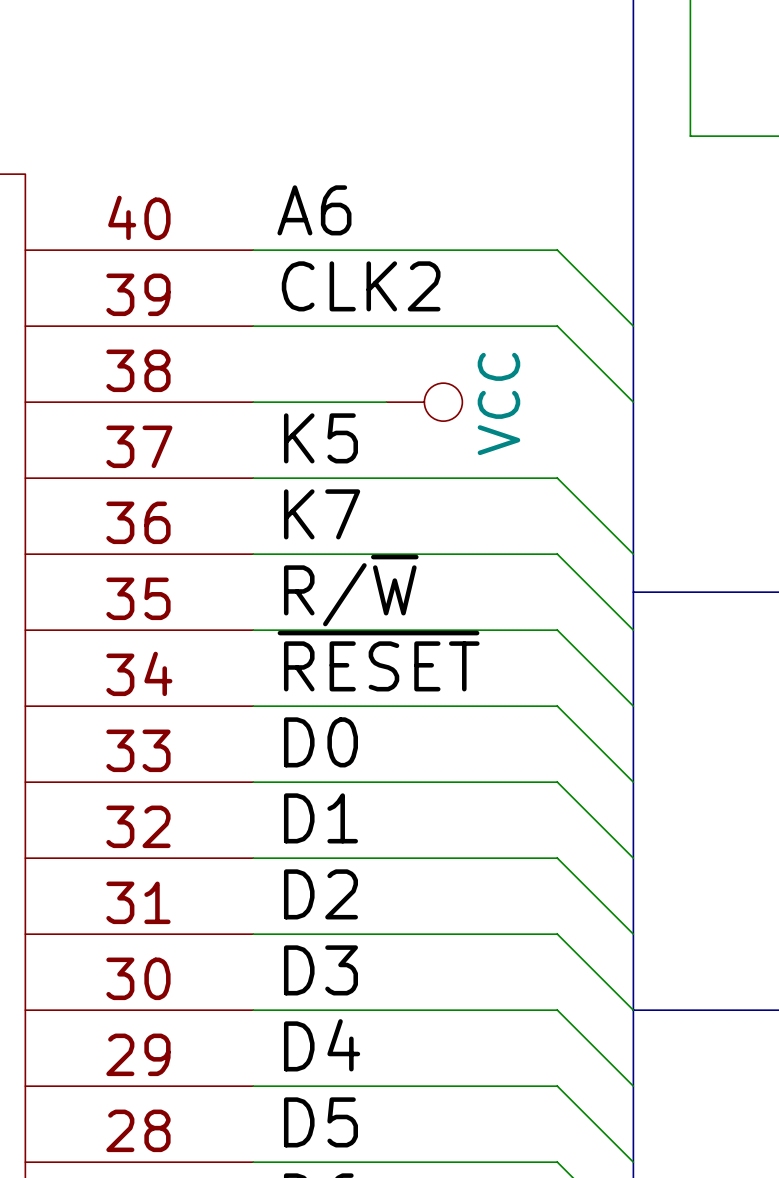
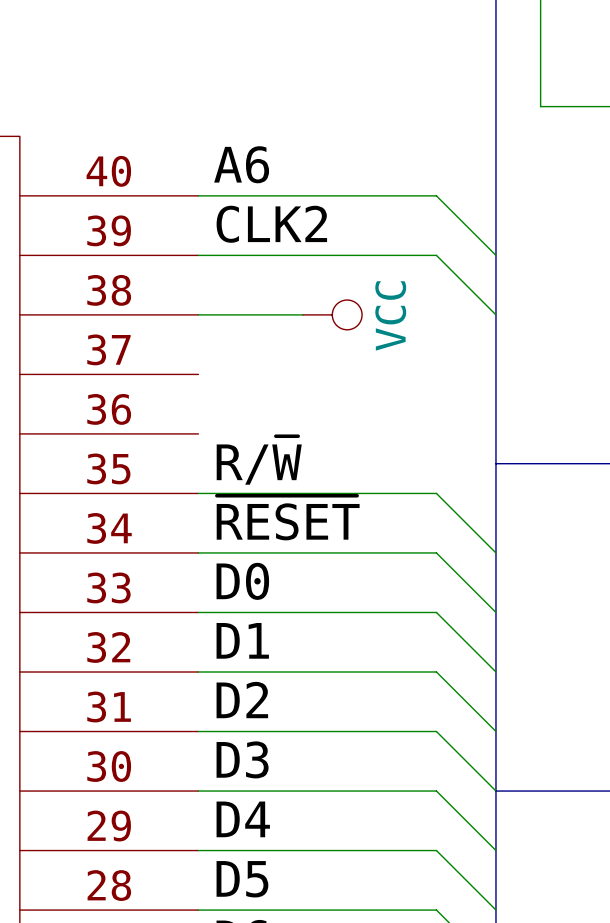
label: K5 (320, 438) -> none
wire: (253, 478) (557, 478) (633, 554) -> none
label: K7 (322, 514) -> none
wire: (253, 554) (557, 554) (633, 630) -> none

